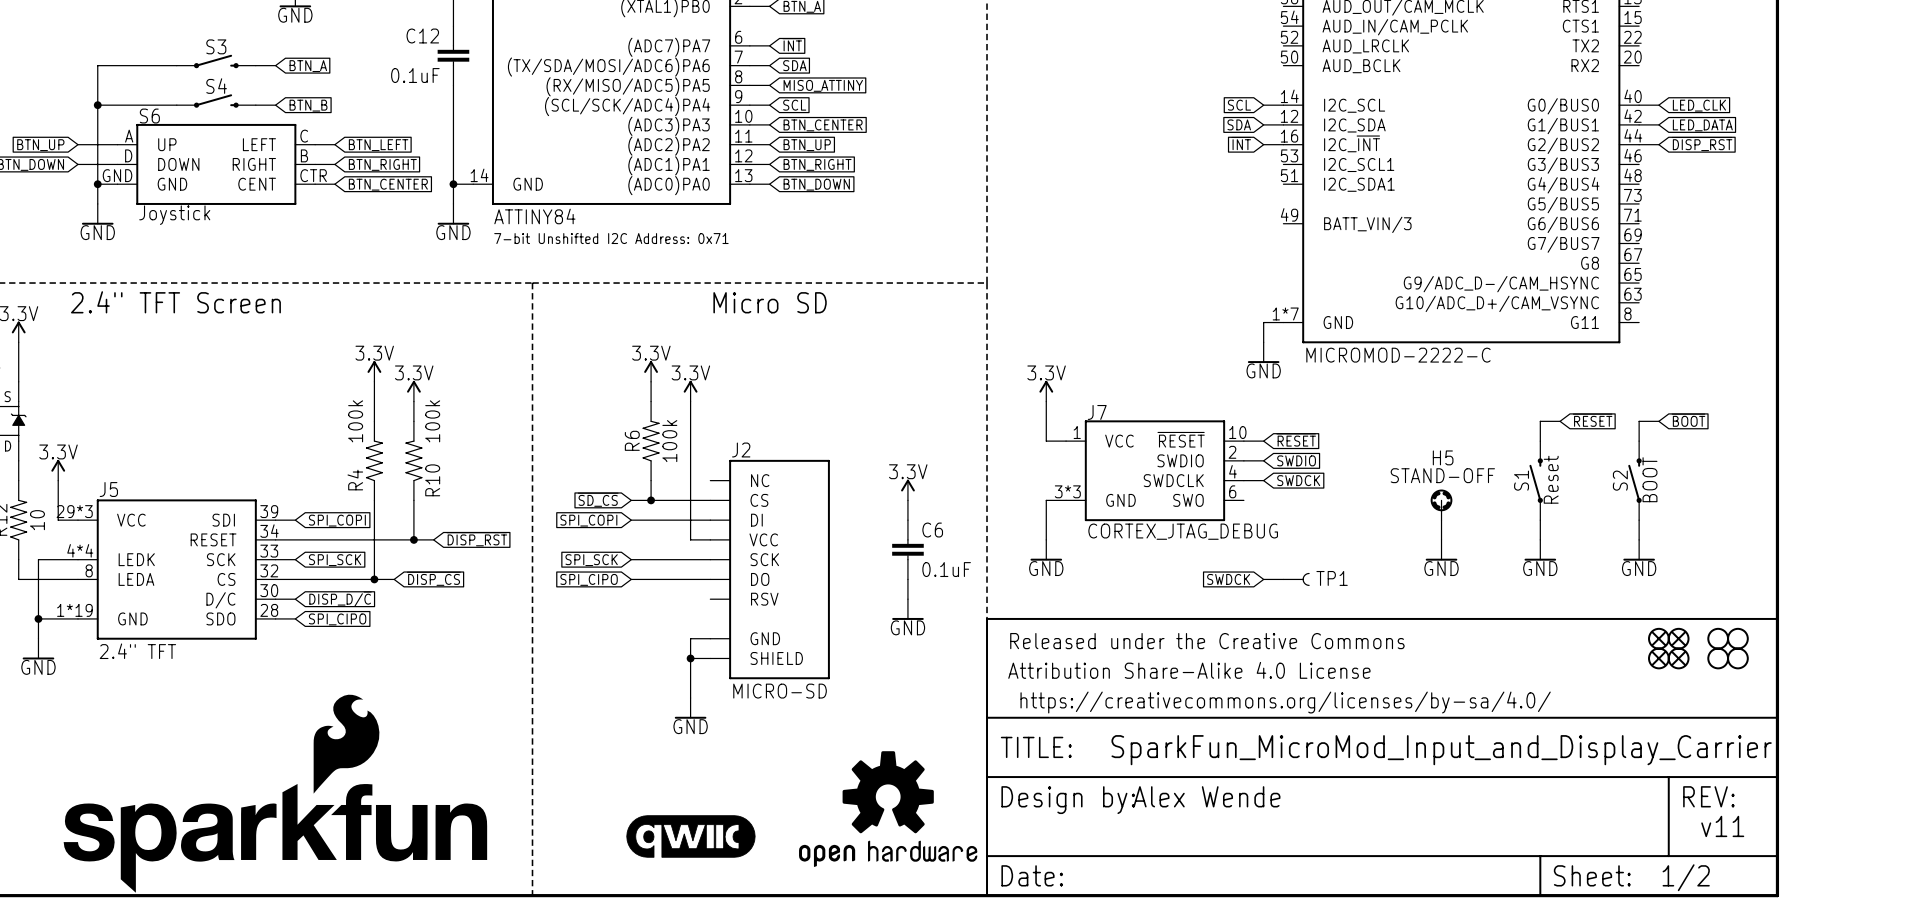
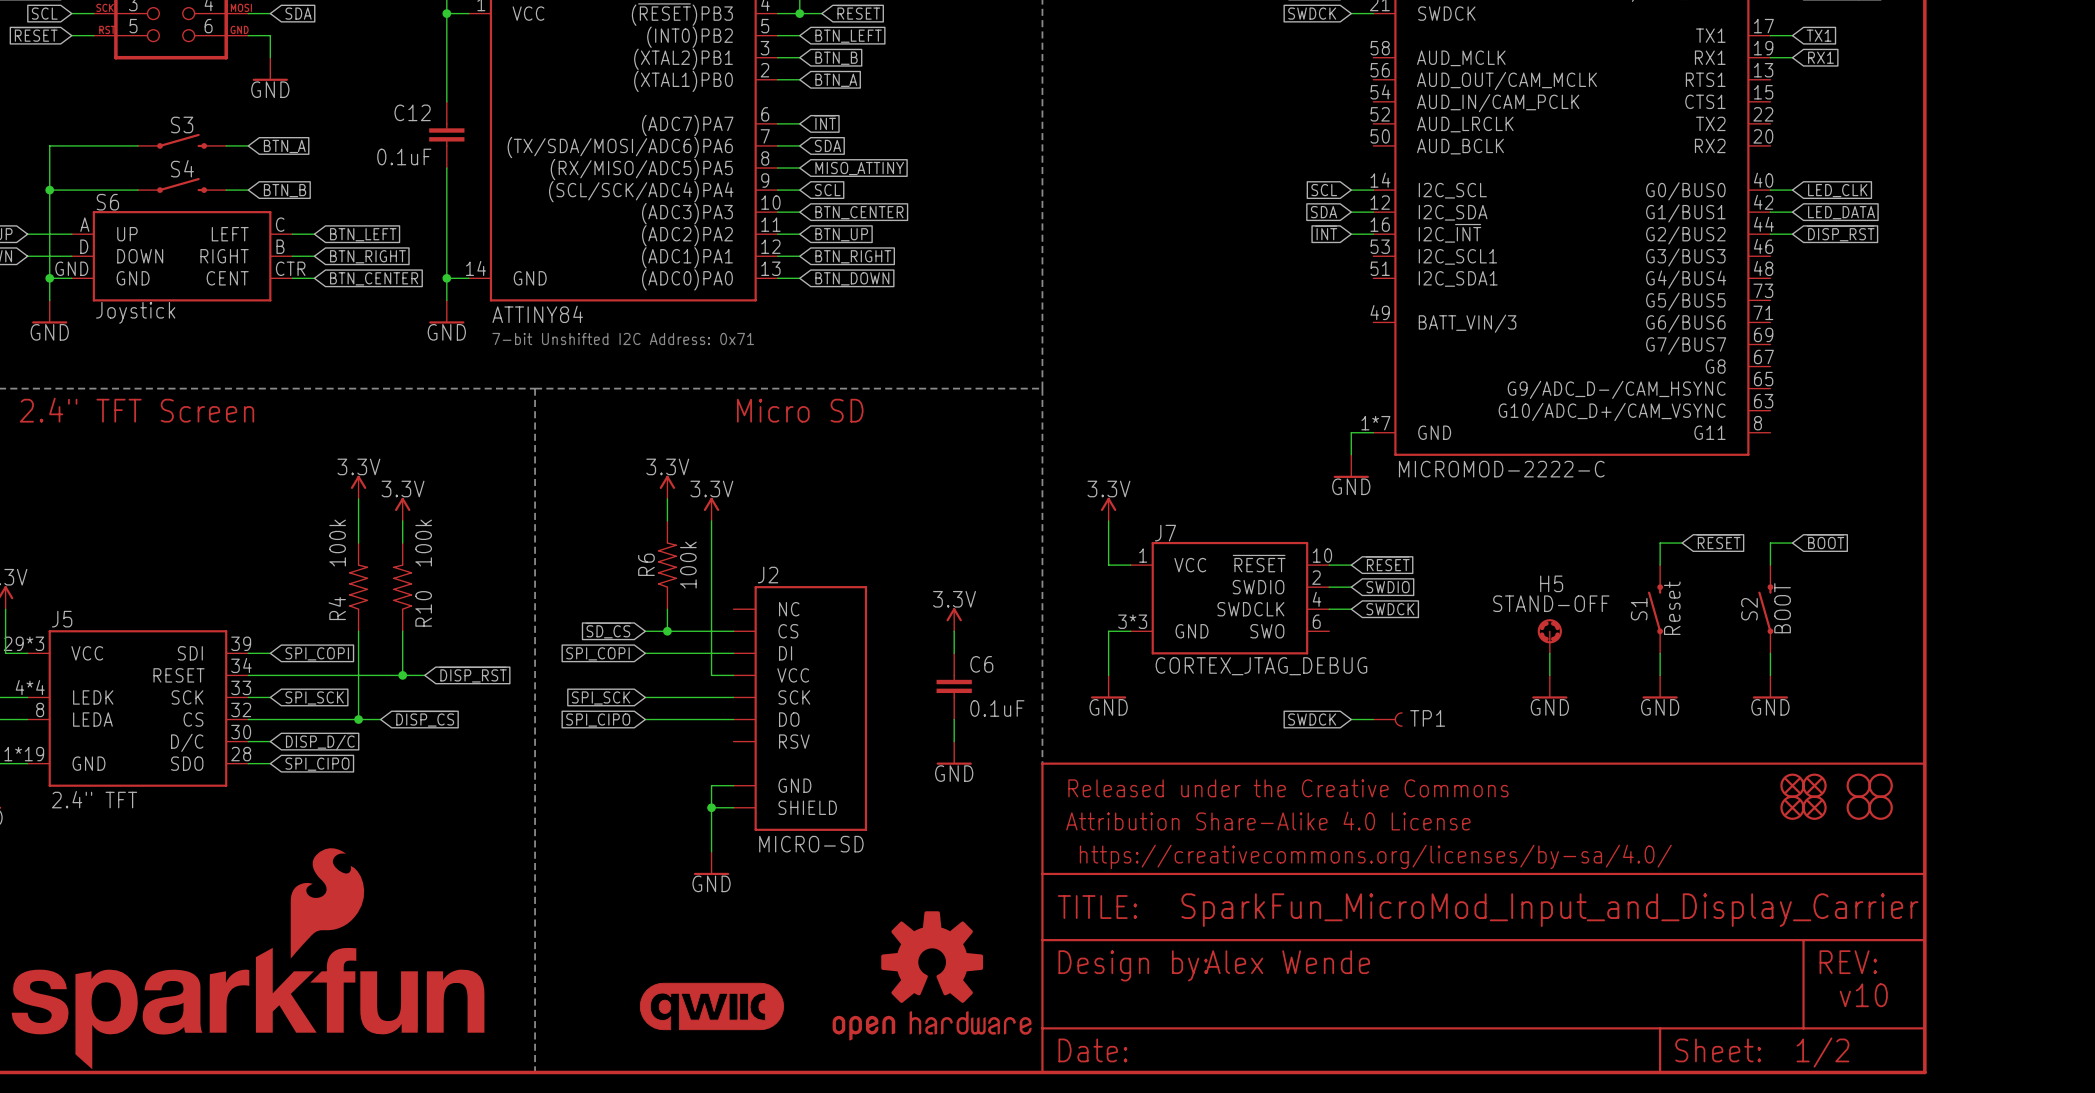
text: v11 (1722, 826) -> v10 (1863, 995)

